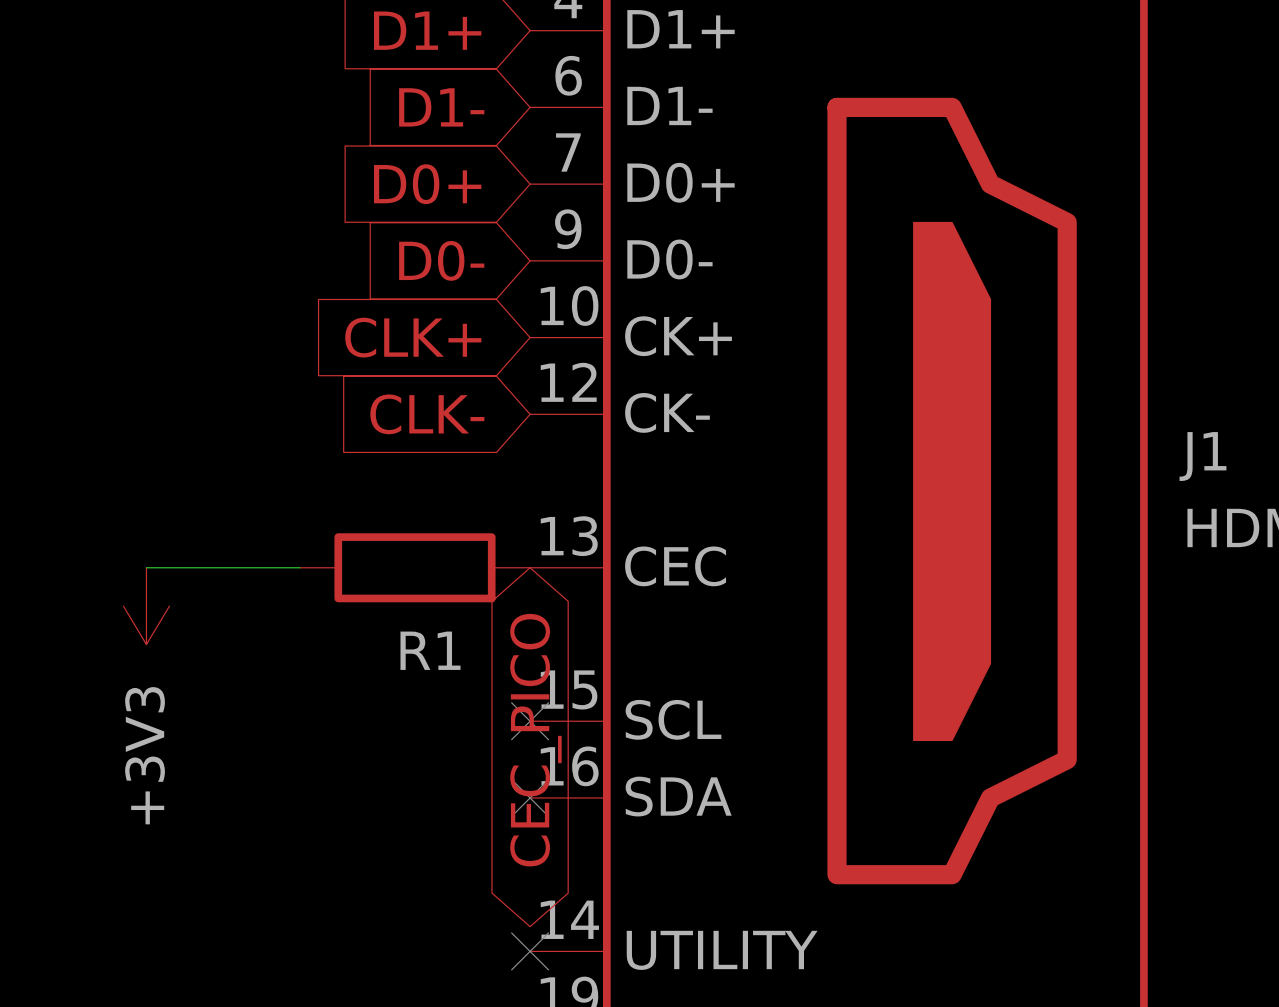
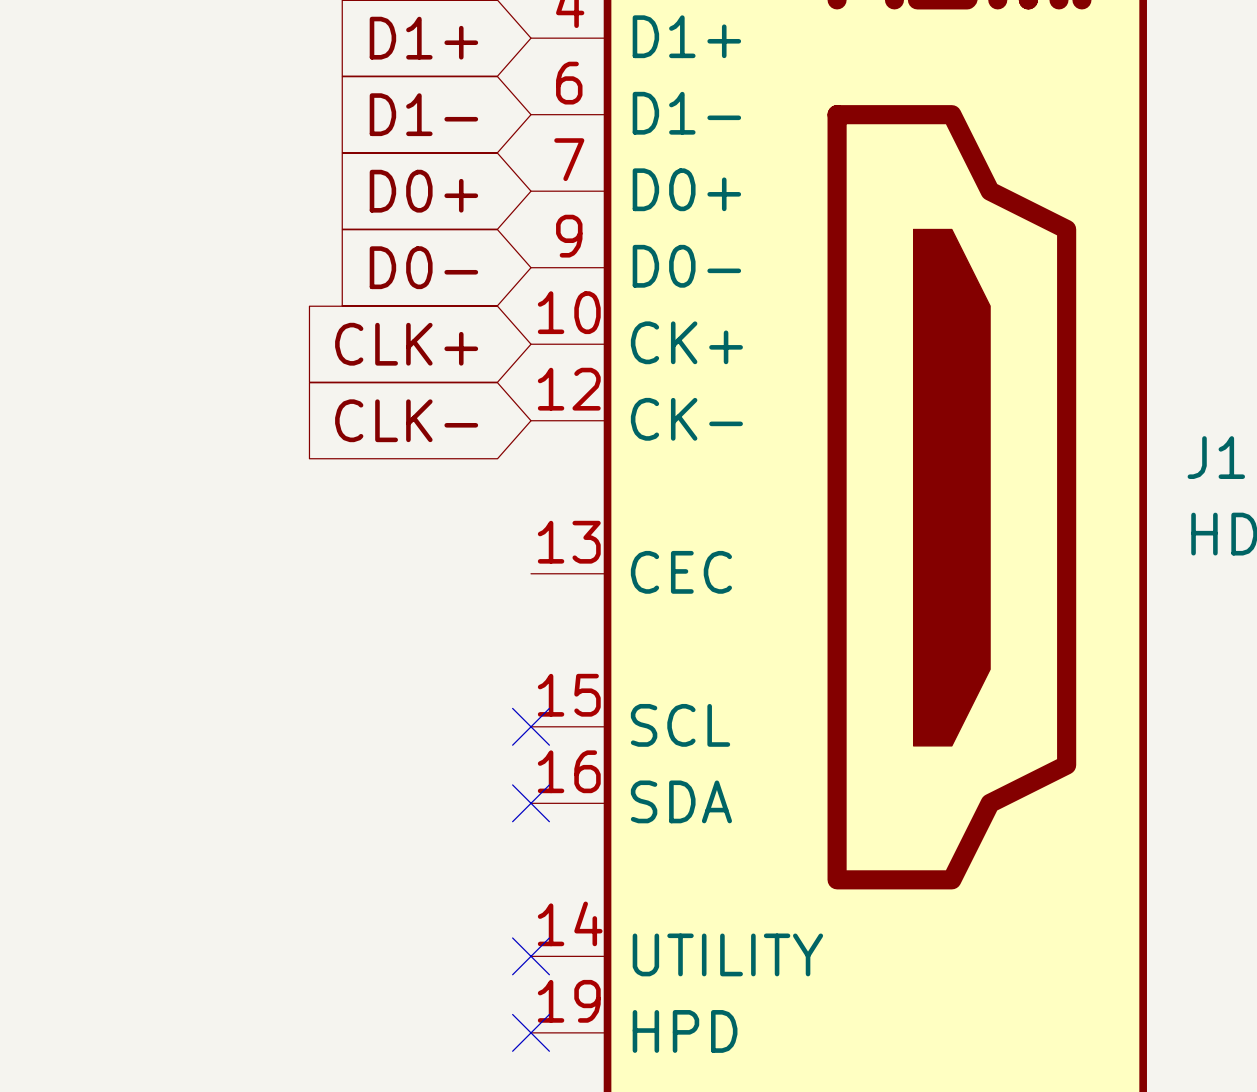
wire: (146, 567) (299, 567) -> none
R1: (414, 567) -> none
power symbol: +3V3 (146, 606) -> none
global label: CEC_PICO (535, 740) -> none

